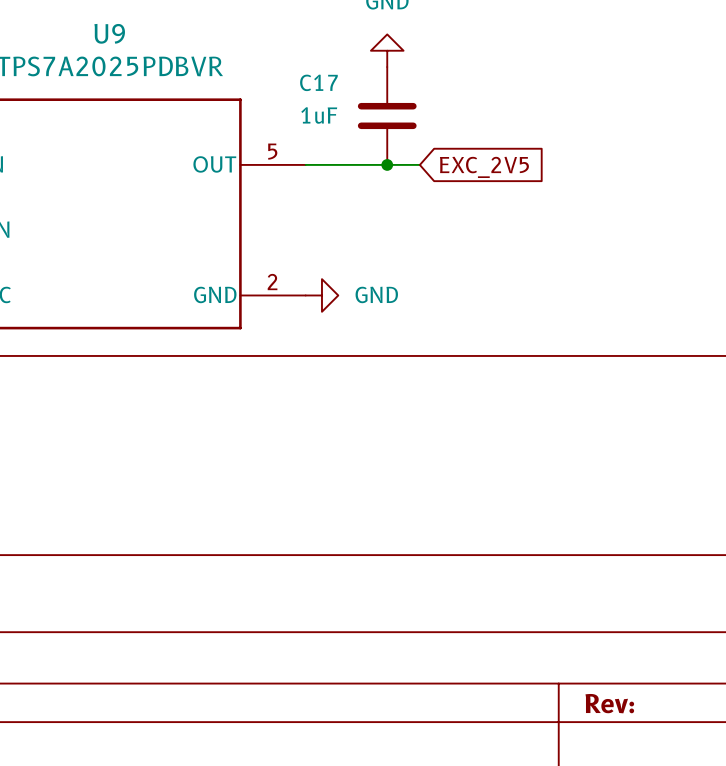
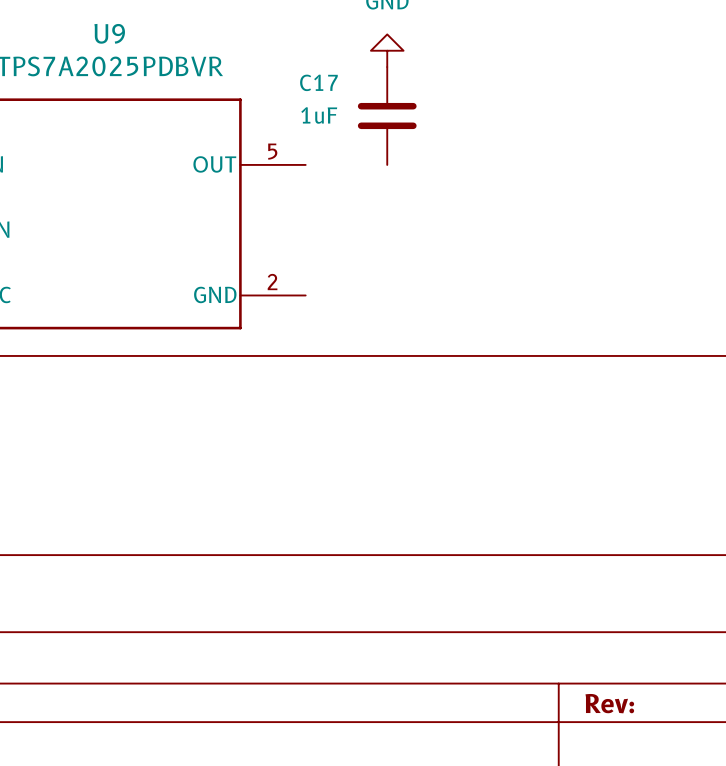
wire: (305, 164) (419, 164) -> none
junction: (387, 164) -> none
global label: EXC_2V5 (484, 167) -> none
power symbol: GND (321, 295) -> none

